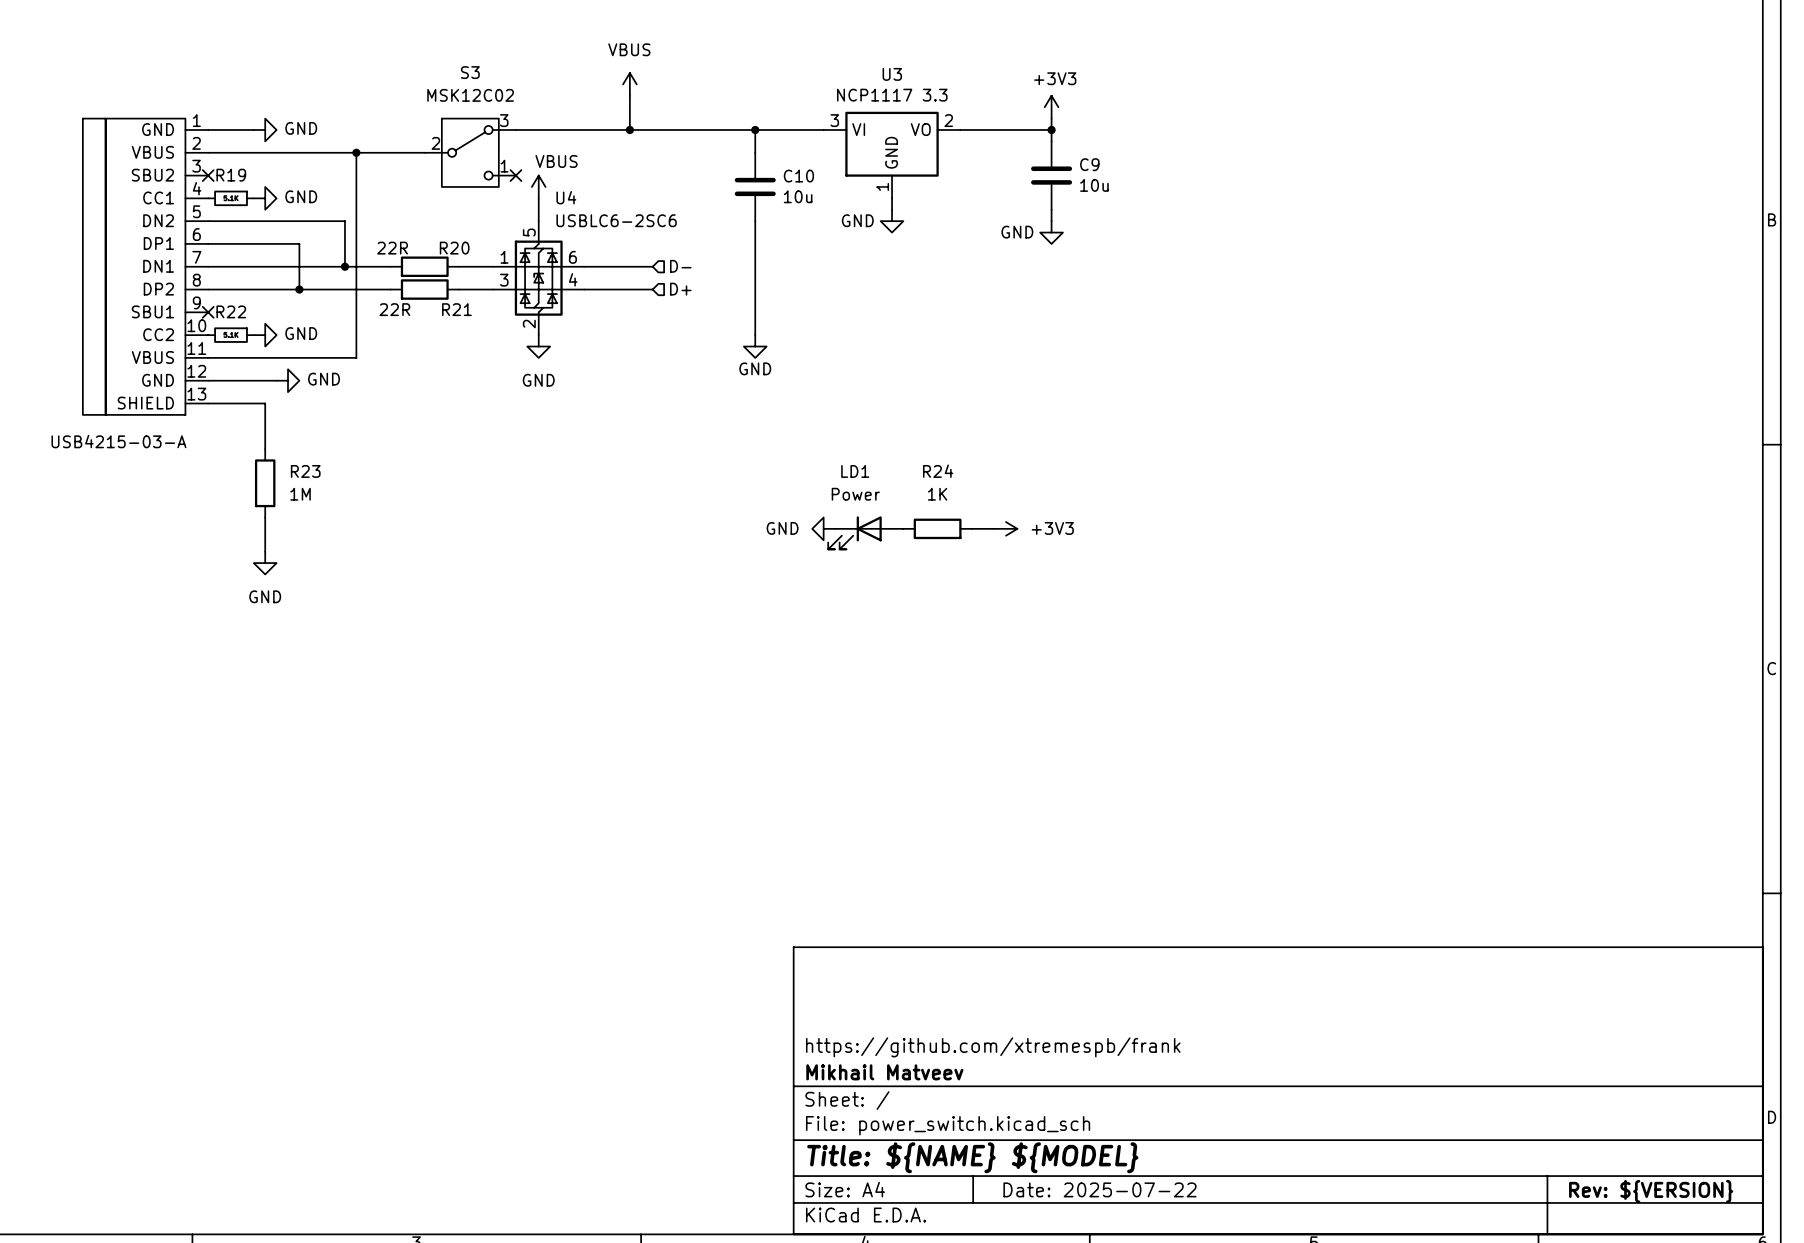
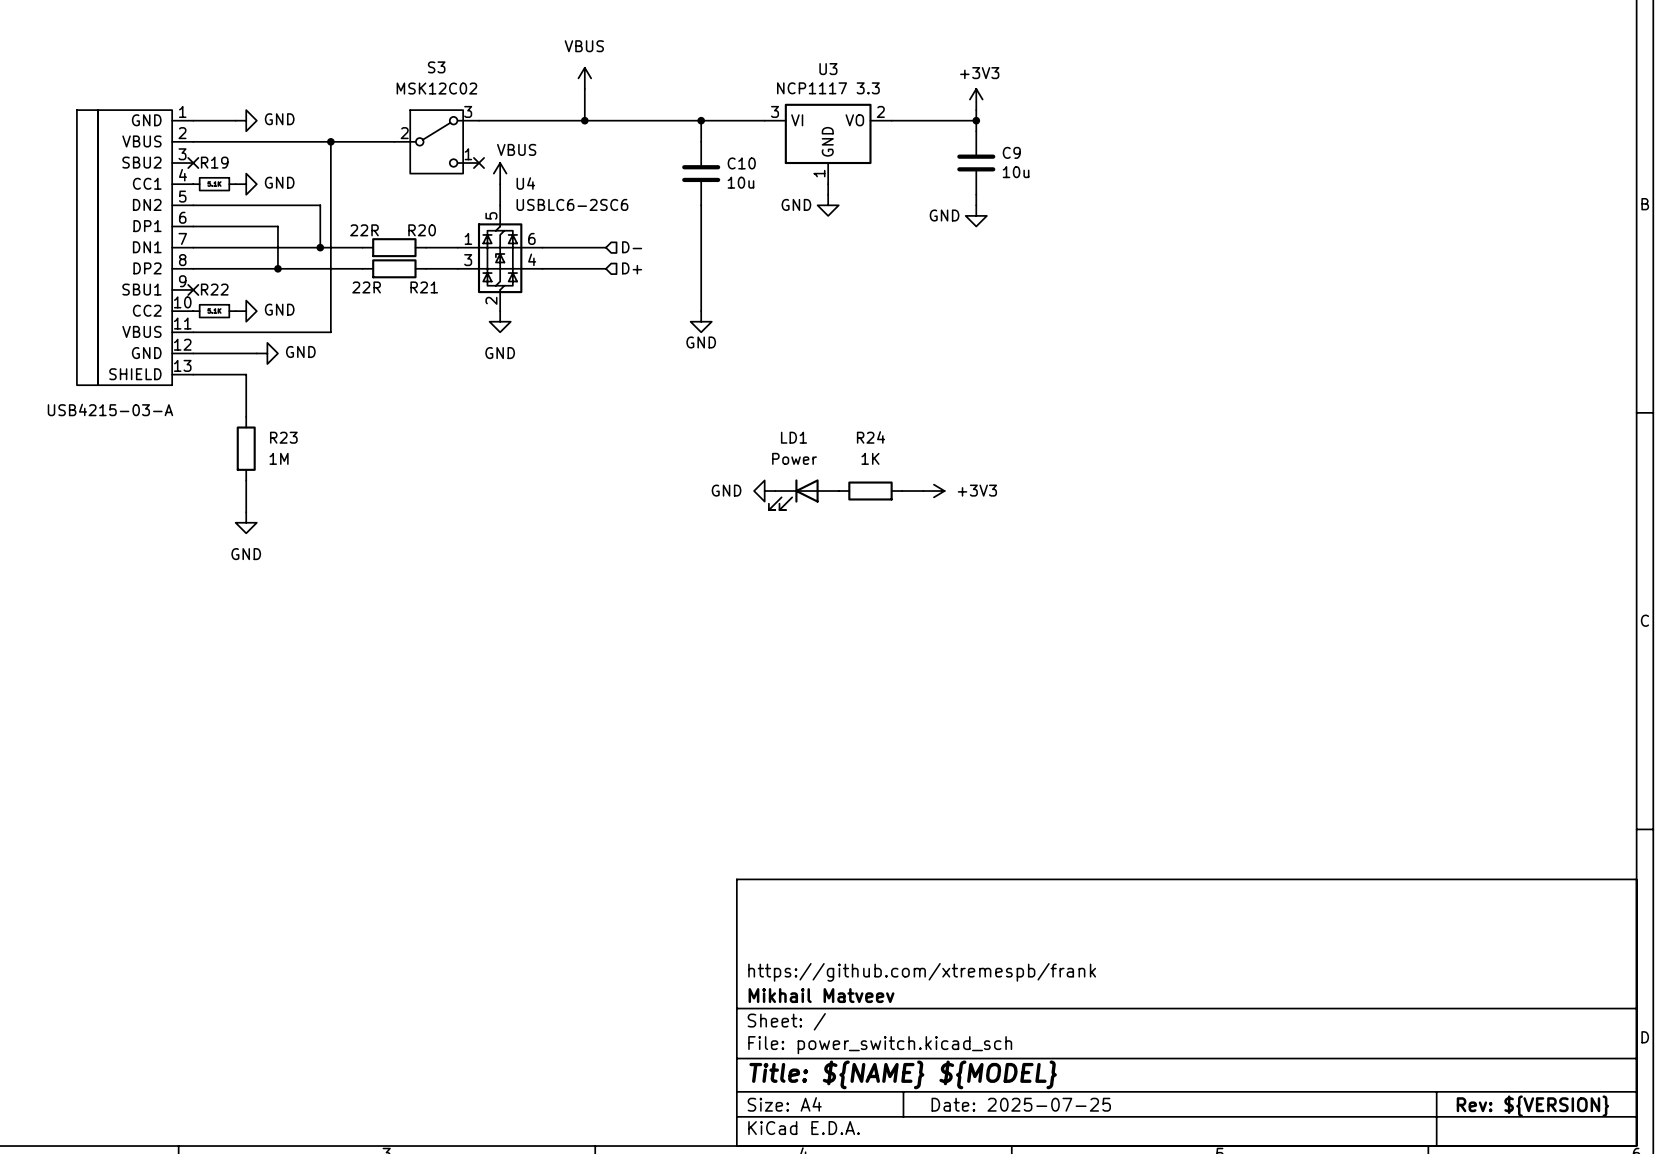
title block: Date: 2025-07-22 (1099, 1189) -> Date: 2025-07-25 (1021, 1104)

